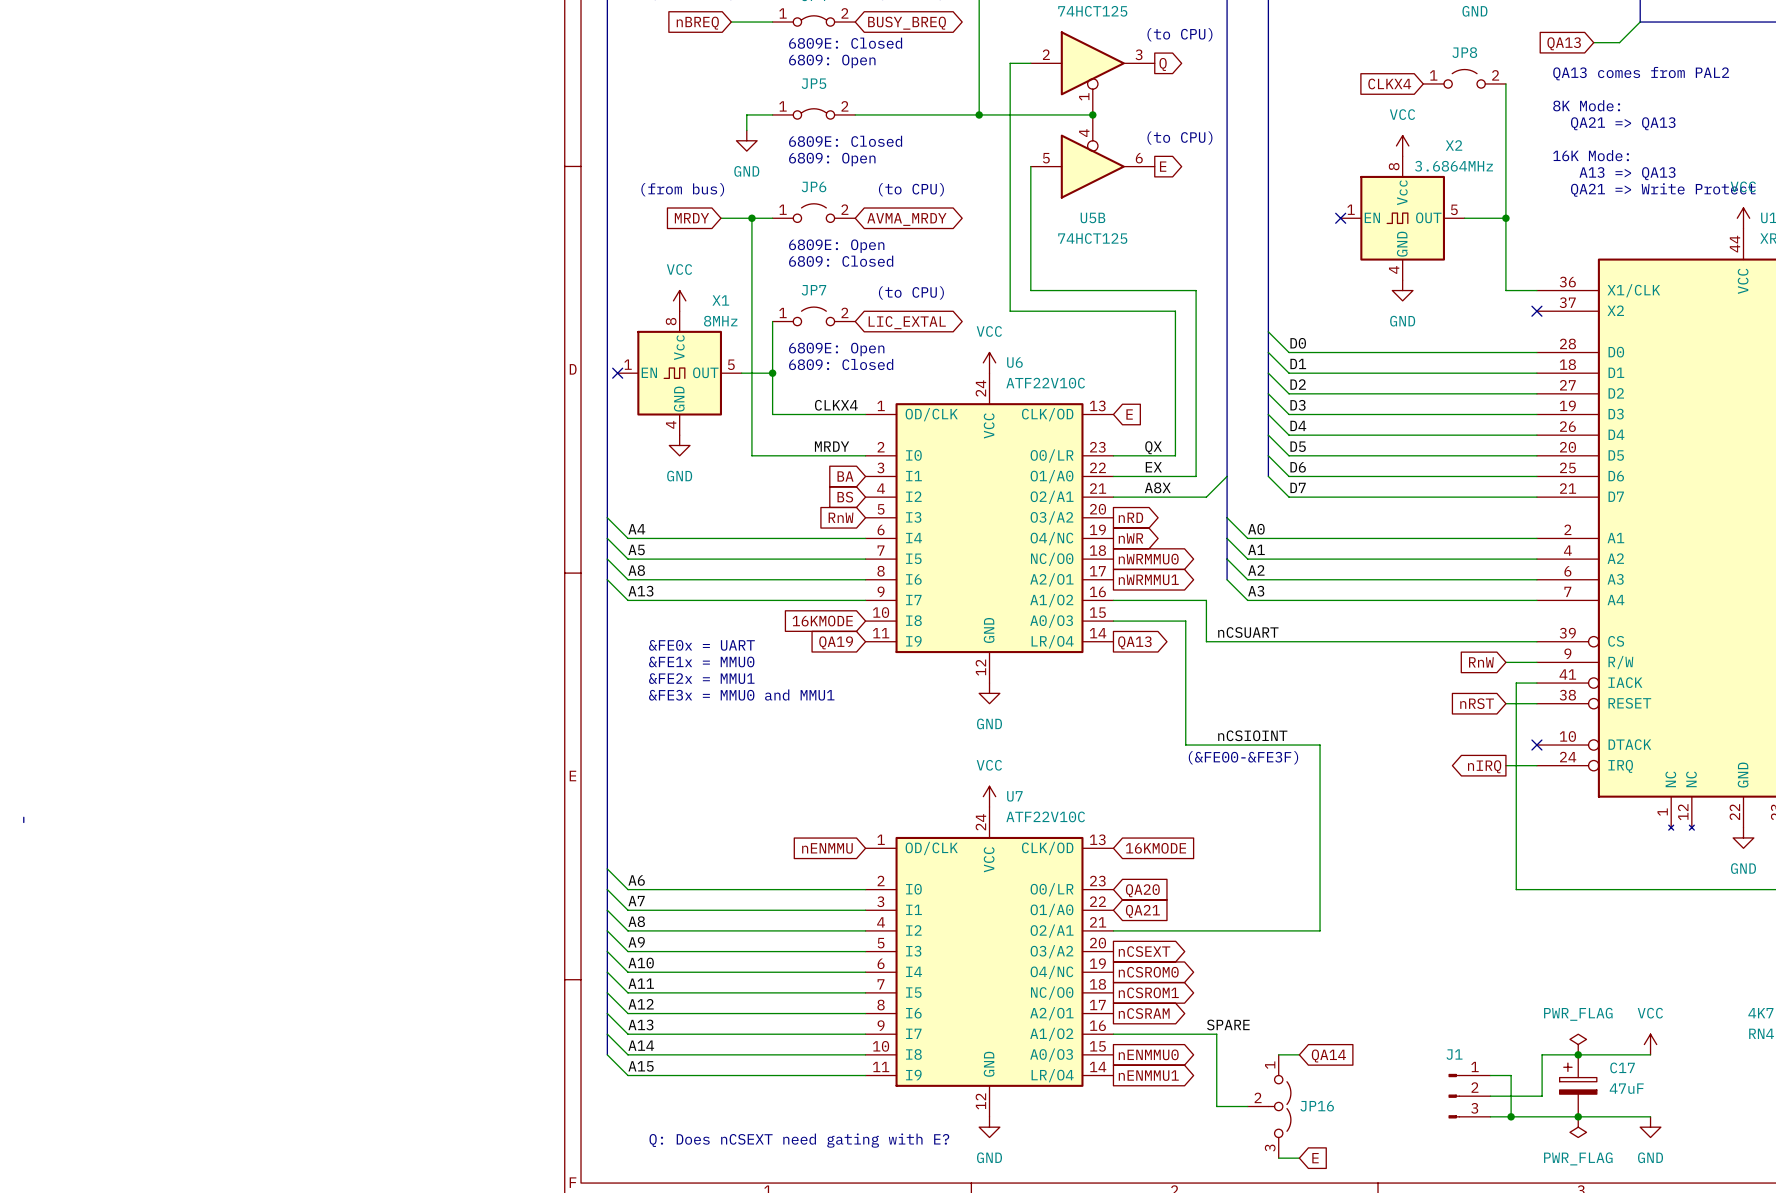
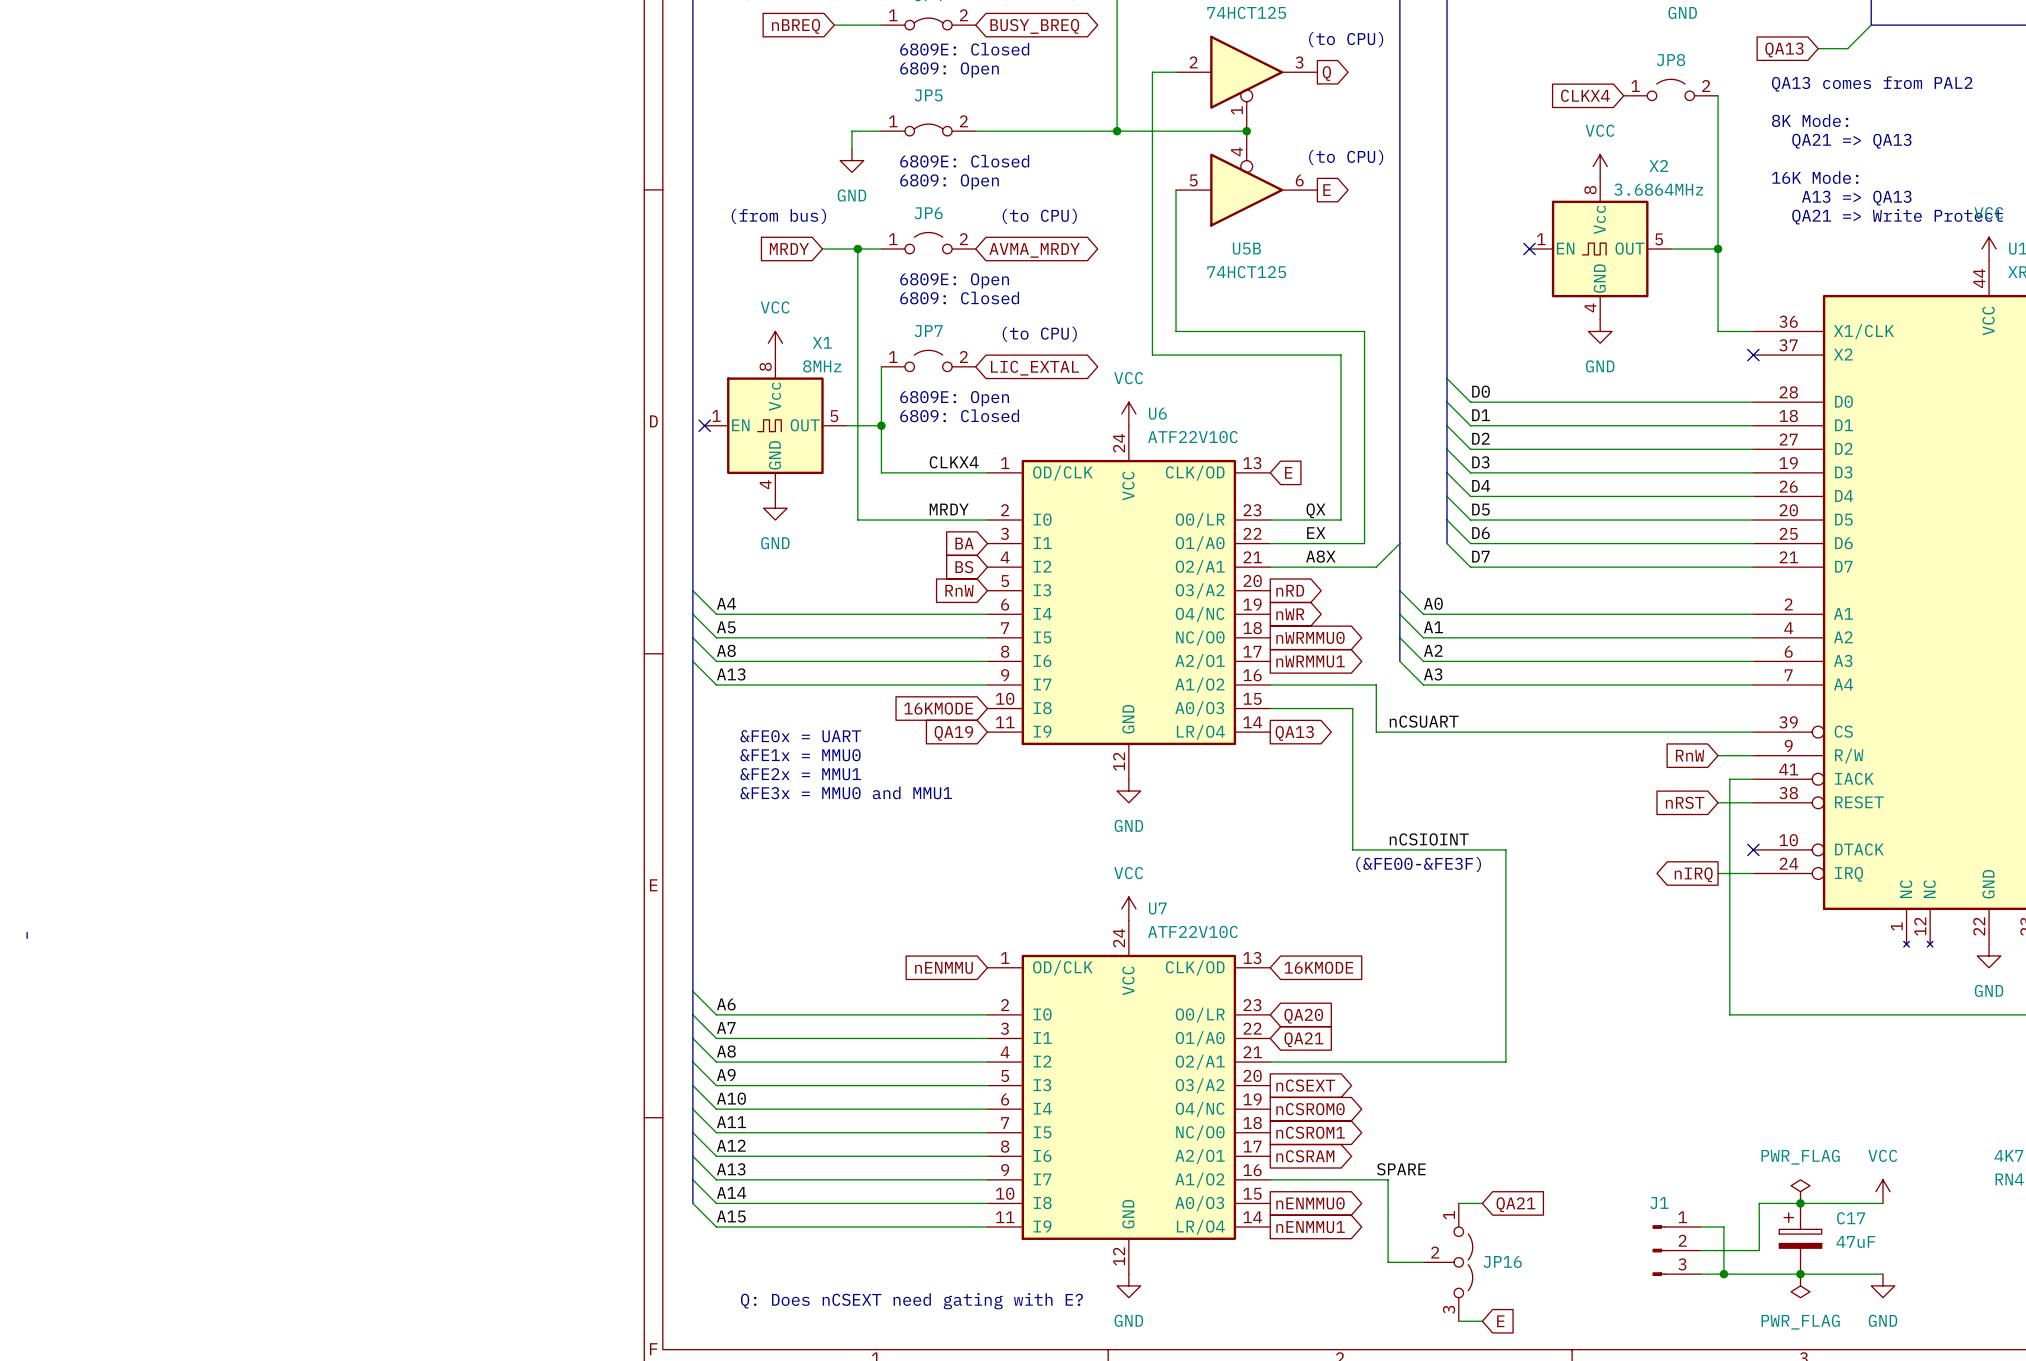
global label: QA14 (1328, 1055) -> QA21 (1515, 1204)

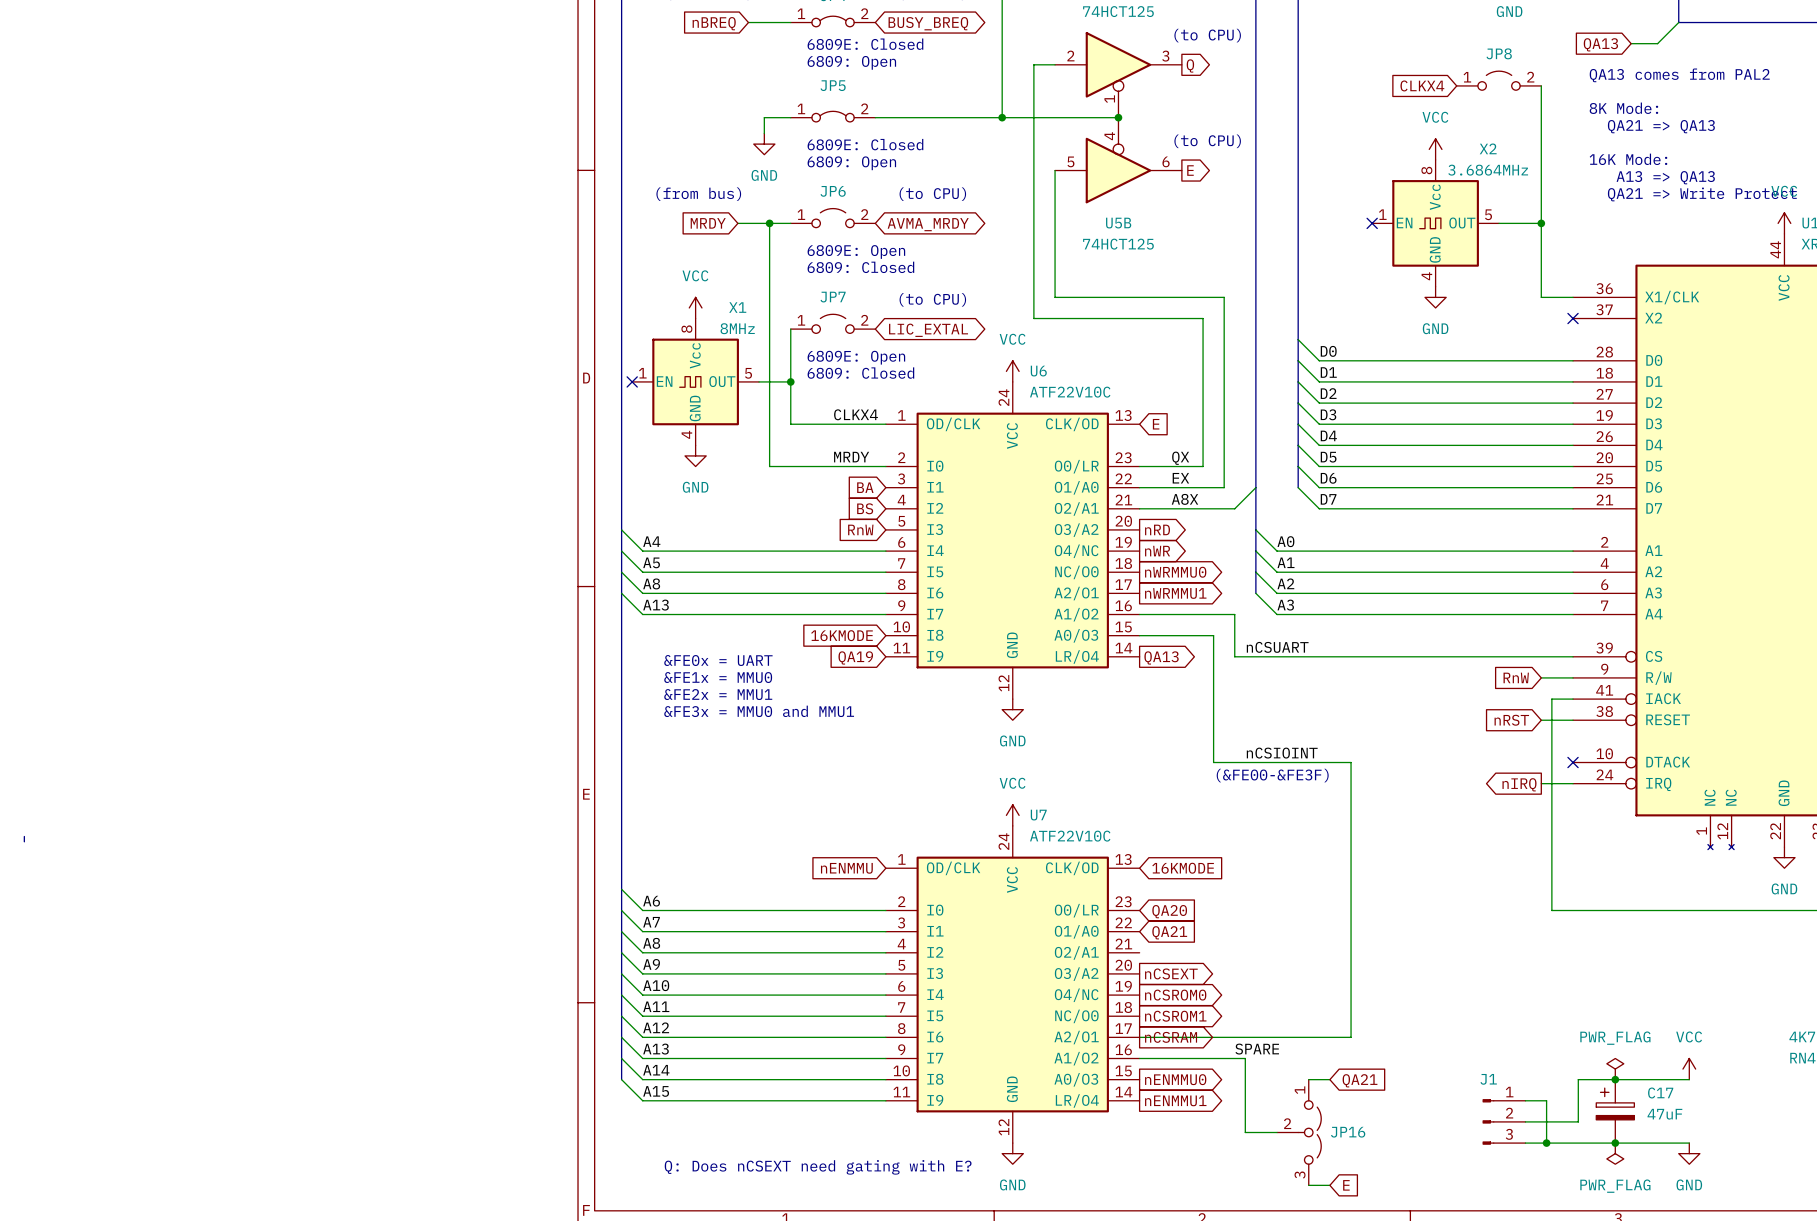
wire: (1270, 1062) (1505, 1062) -> (1139, 1037) (1351, 1037) (1351, 952)

